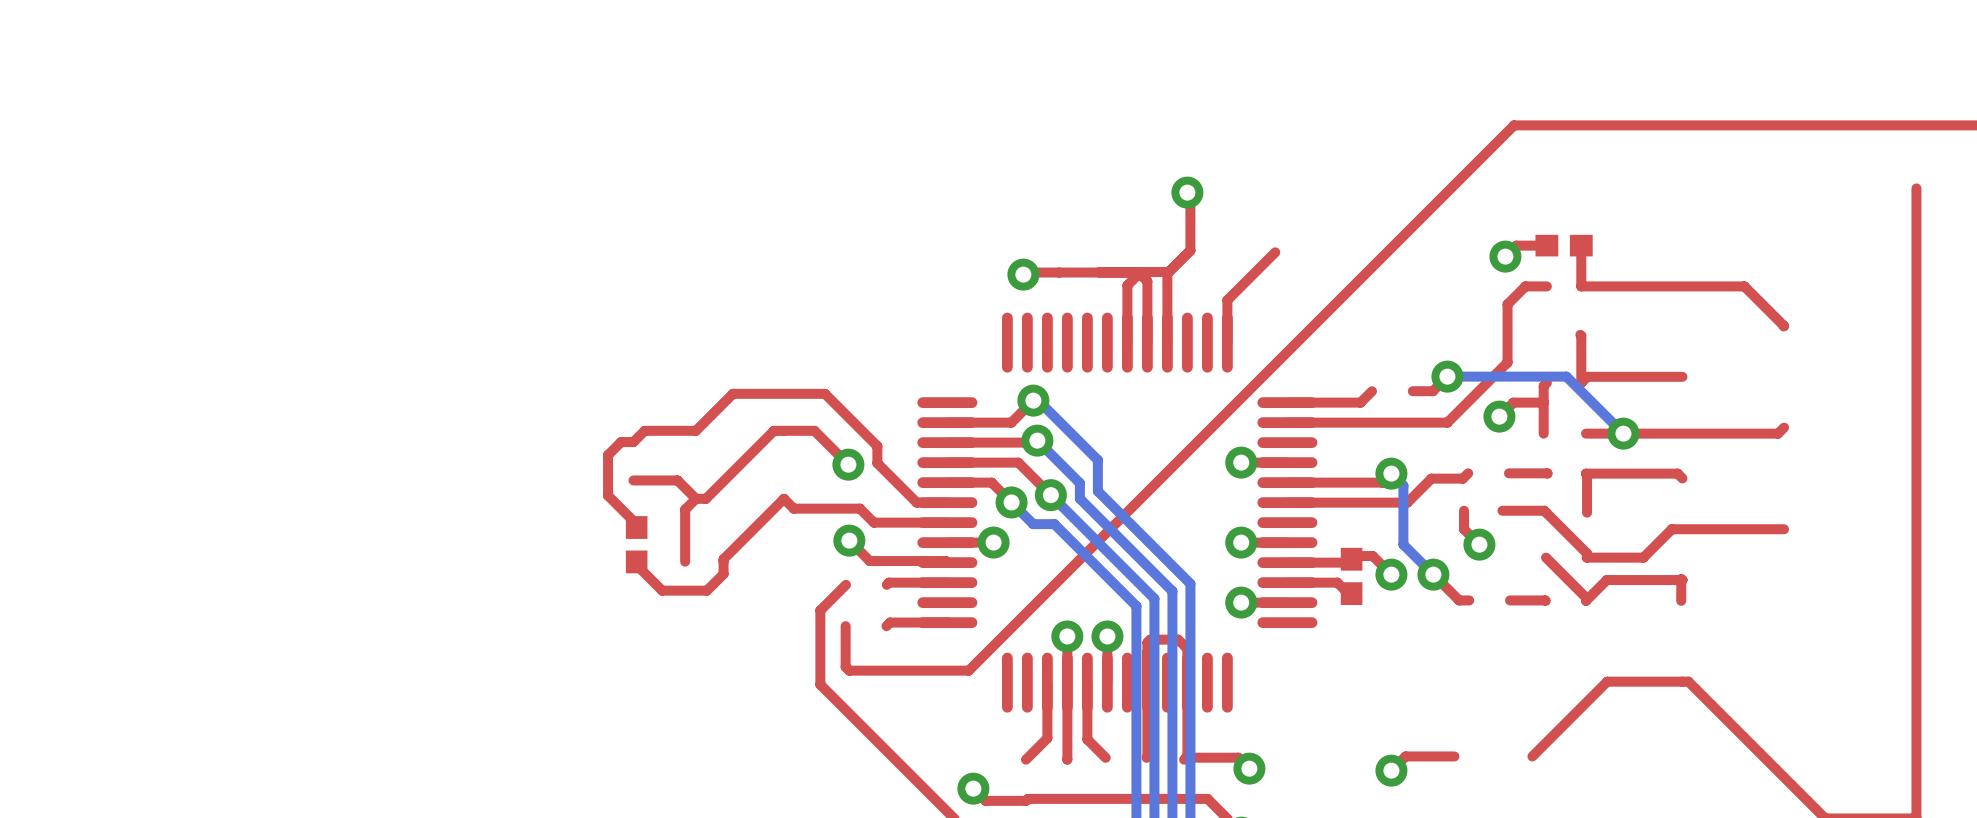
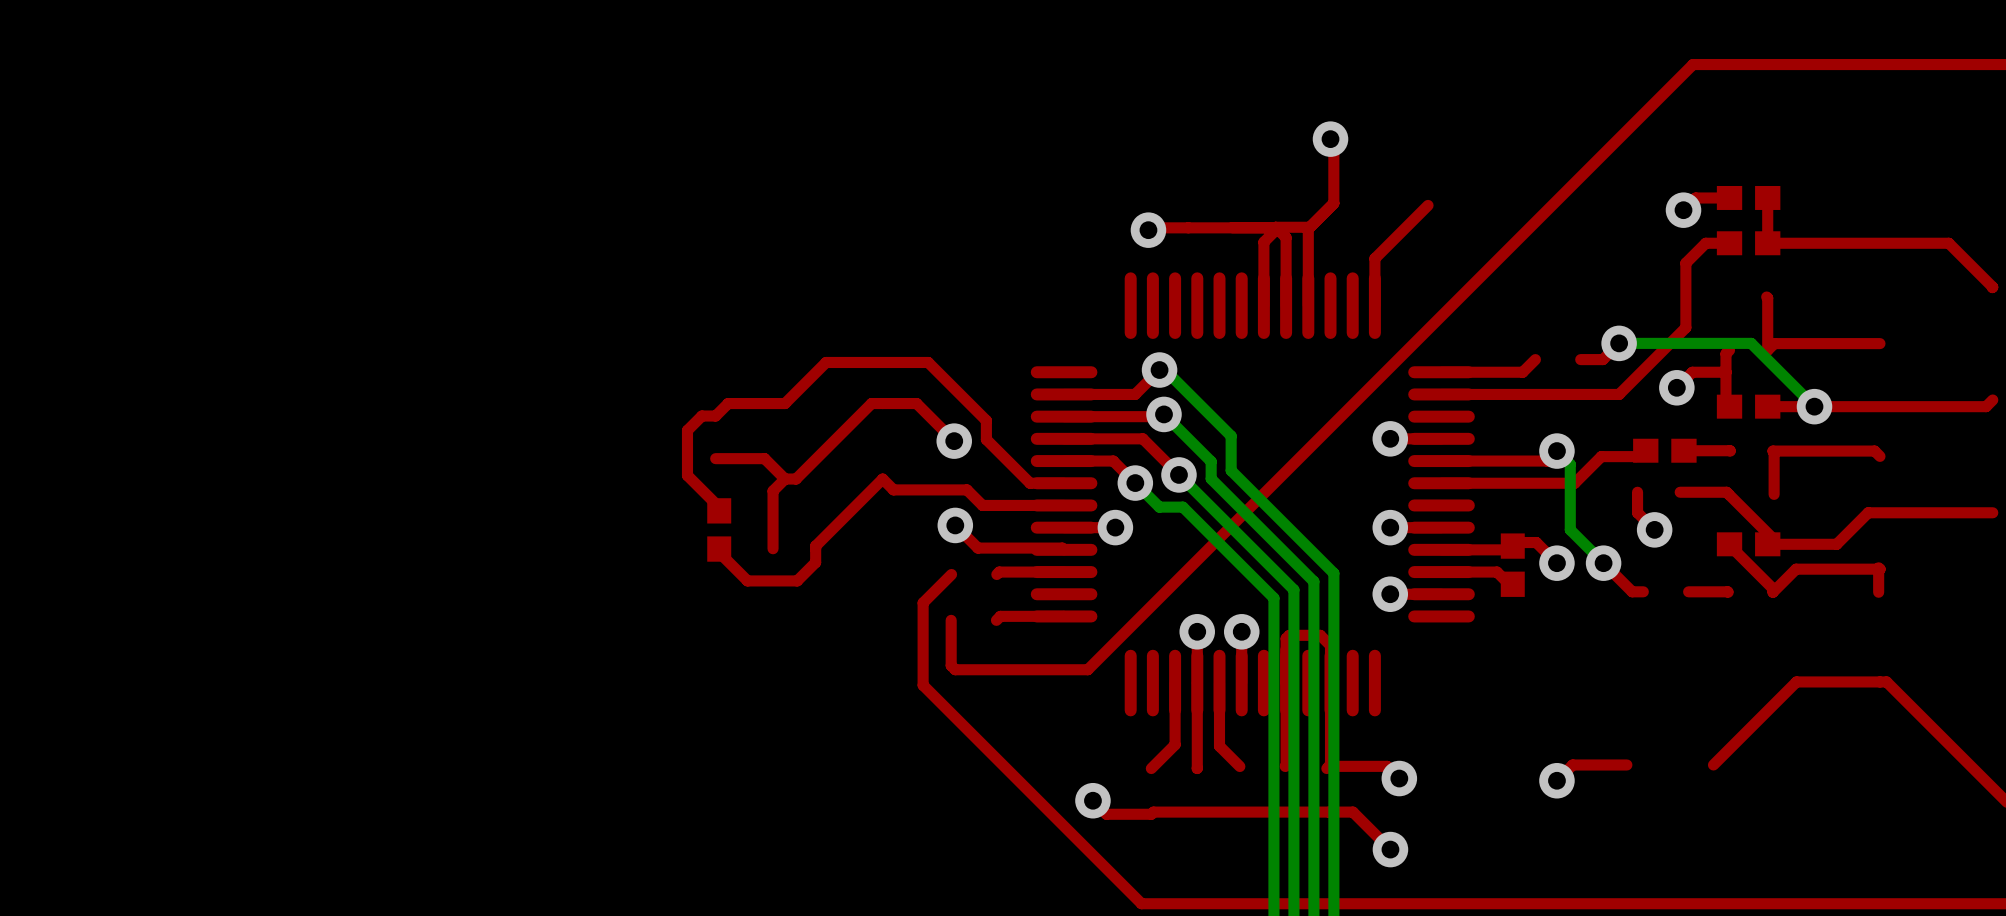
part: none -> (1748, 243)
part: none -> (1748, 406)
part: none -> (1664, 450)
part: none -> (1748, 544)

